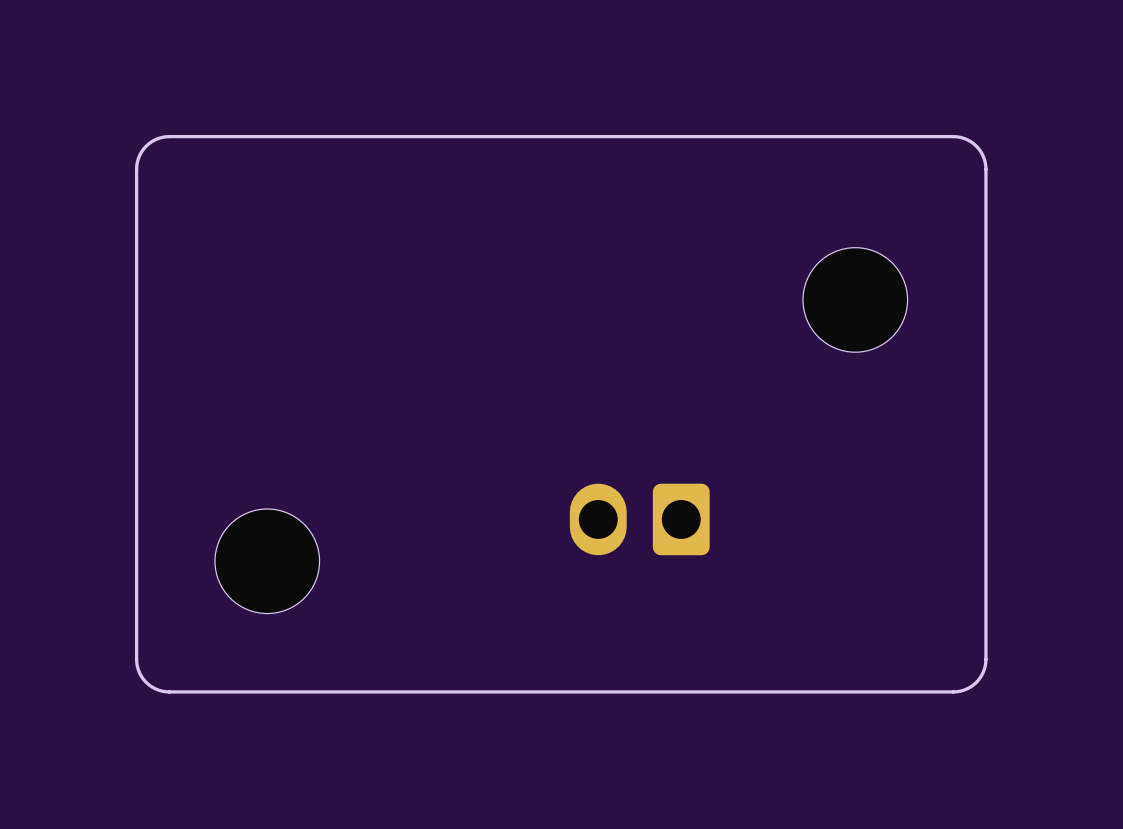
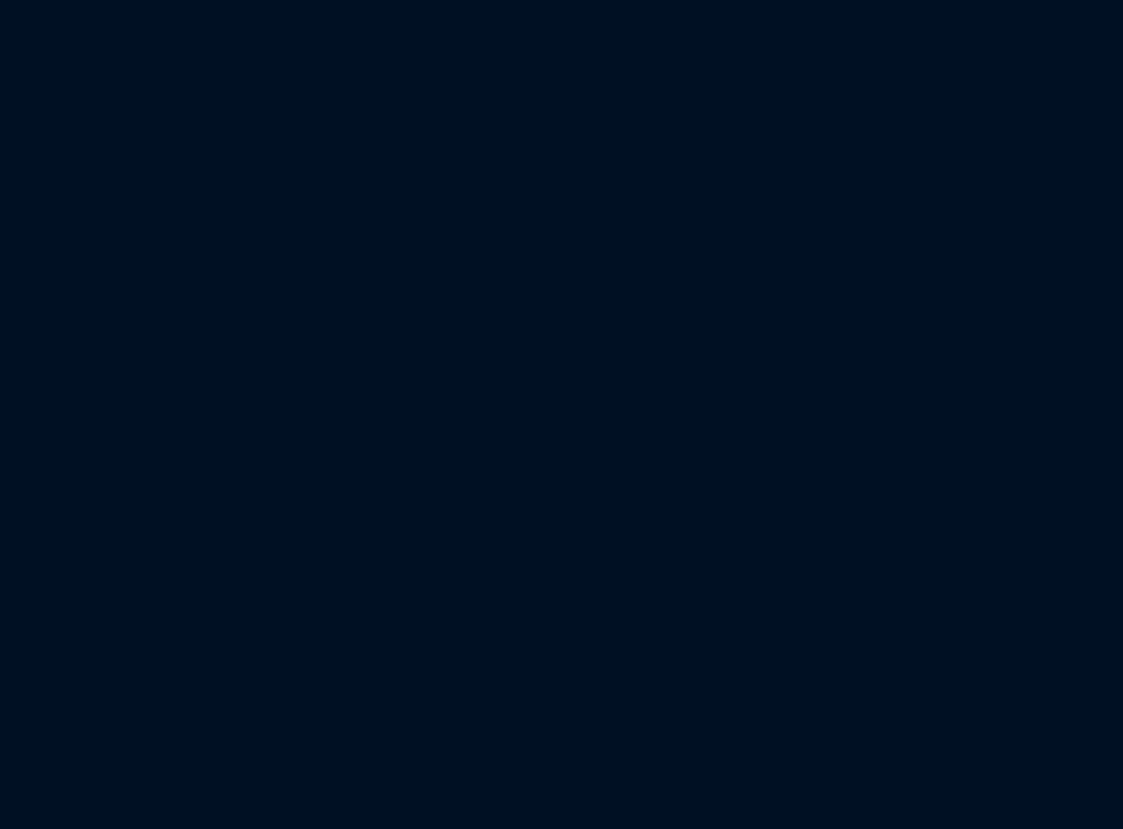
board edge: (953, 136) (169, 136) (151, 141) (139, 155) (136, 169) (136, 659) (141, 676) (151, 686) (169, 691) (953, 691) (970, 686) (982, 673) (985, 659) (985, 169) (982, 155) (976, 146) (967, 139) (953, 136) -> none
part: (855, 299) -> none
part: (639, 519) -> none
part: (267, 561) -> none

